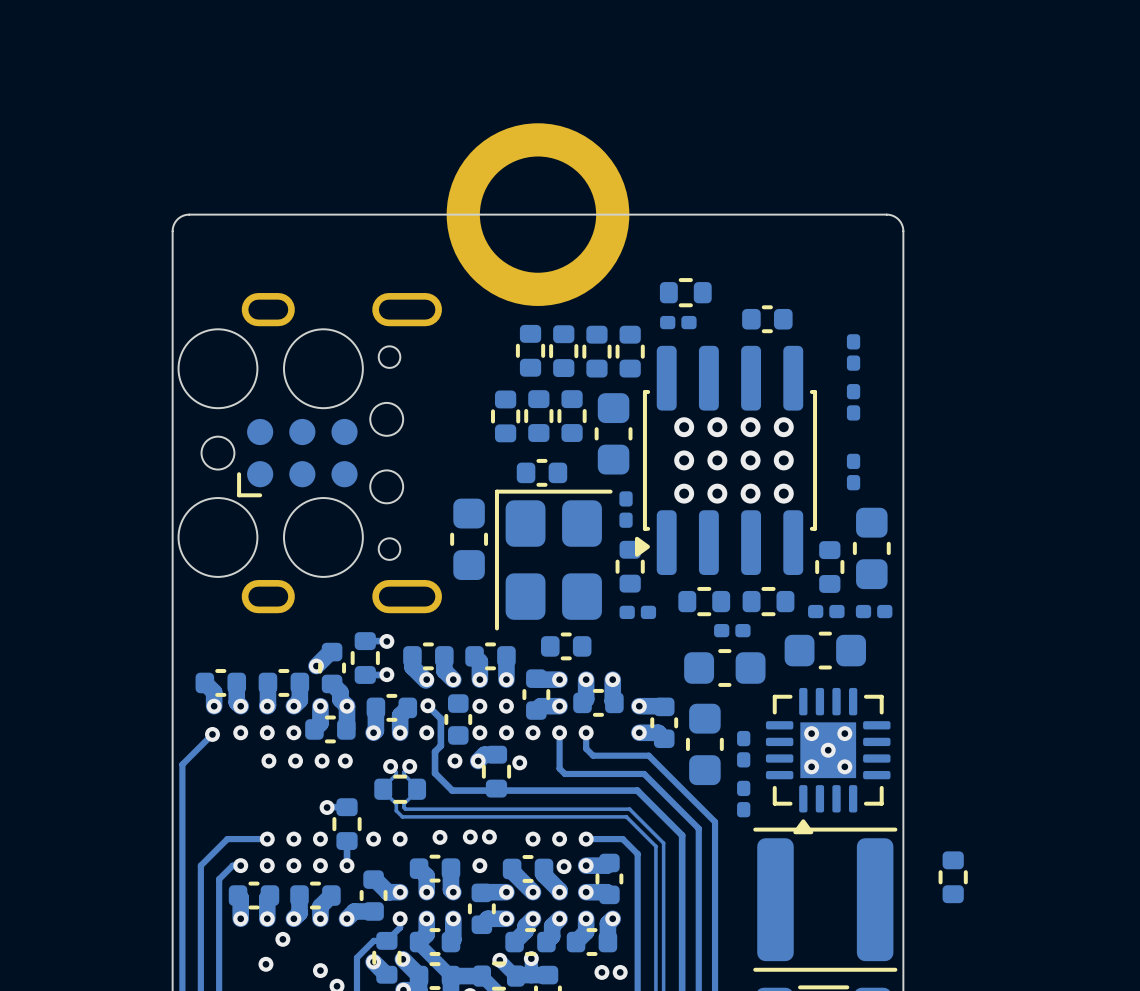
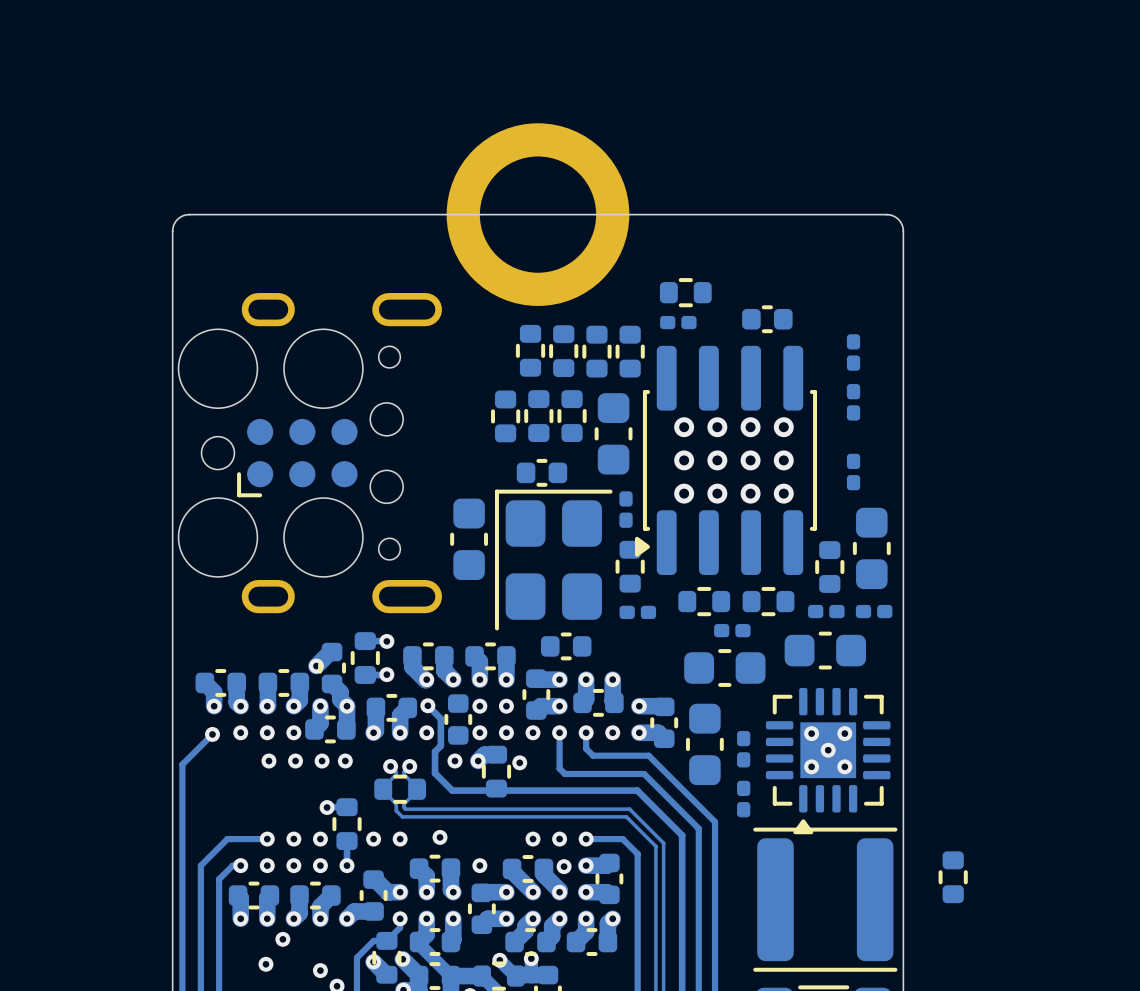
via: none -> (612, 732)
via: (470, 837) -> none
via: (489, 837) -> none
via: (601, 972) -> none
via: (620, 972) -> none

